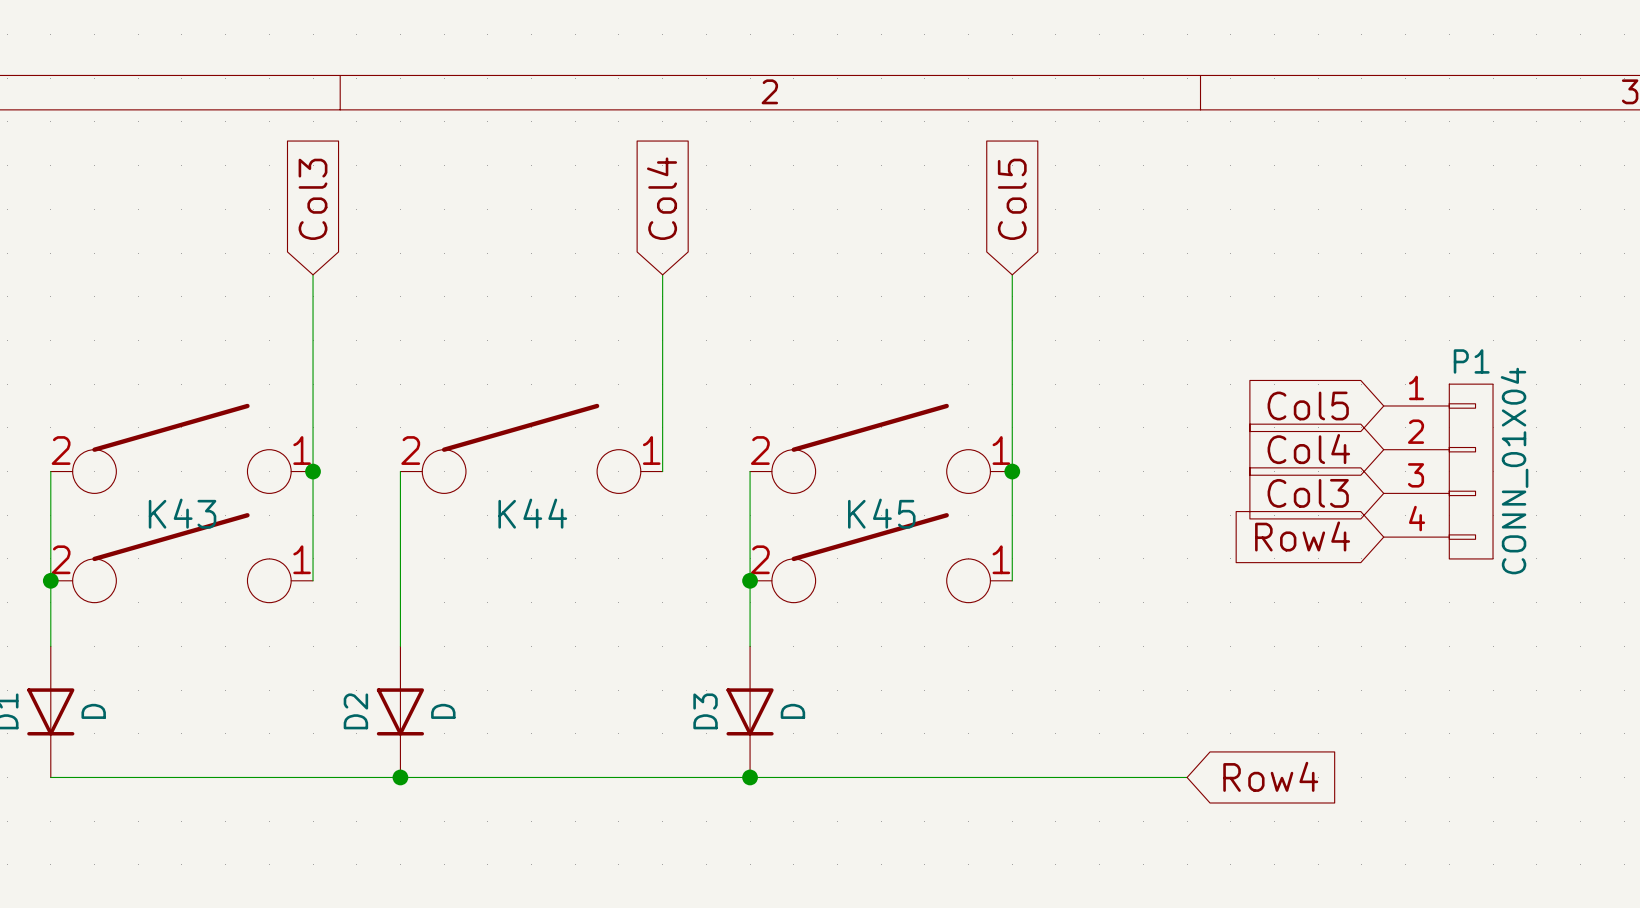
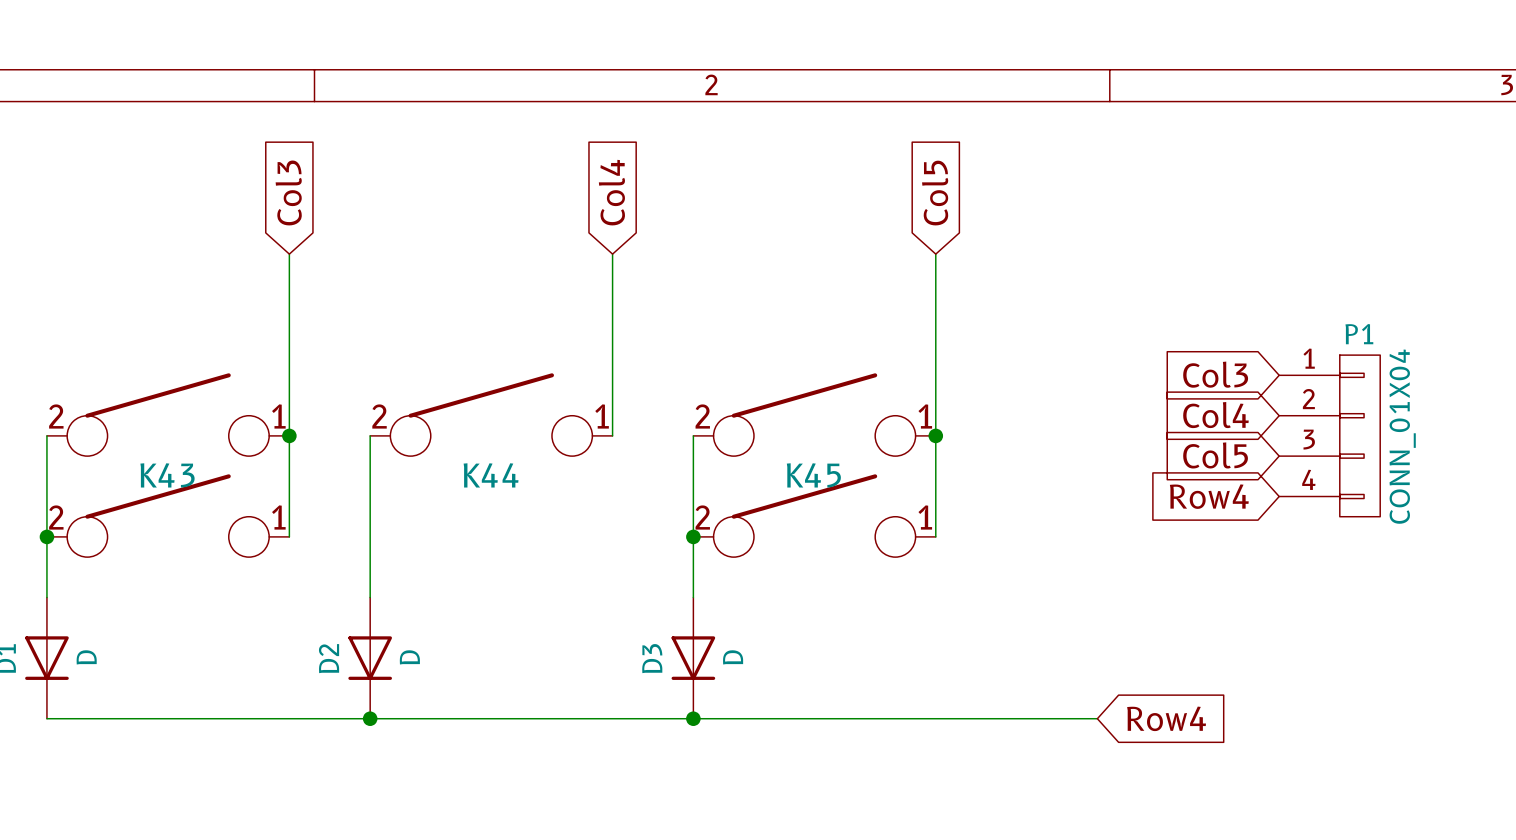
global label: Col5 (1308, 405) -> Col3 (1215, 374)
global label: Col3 (1308, 493) -> Col5 (1215, 455)

